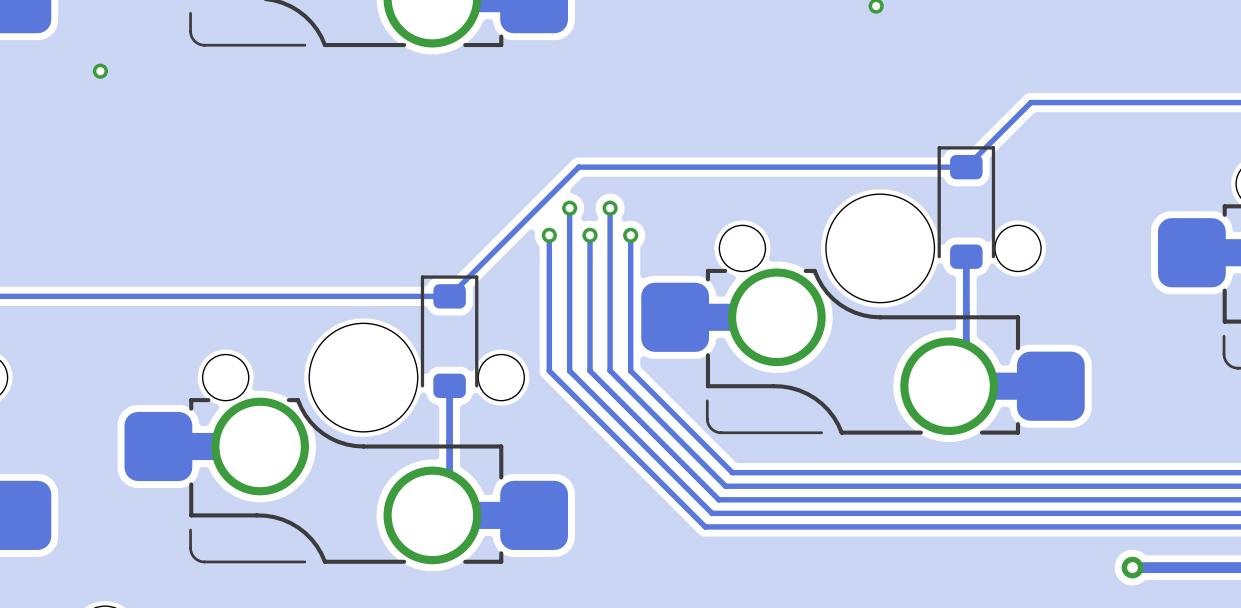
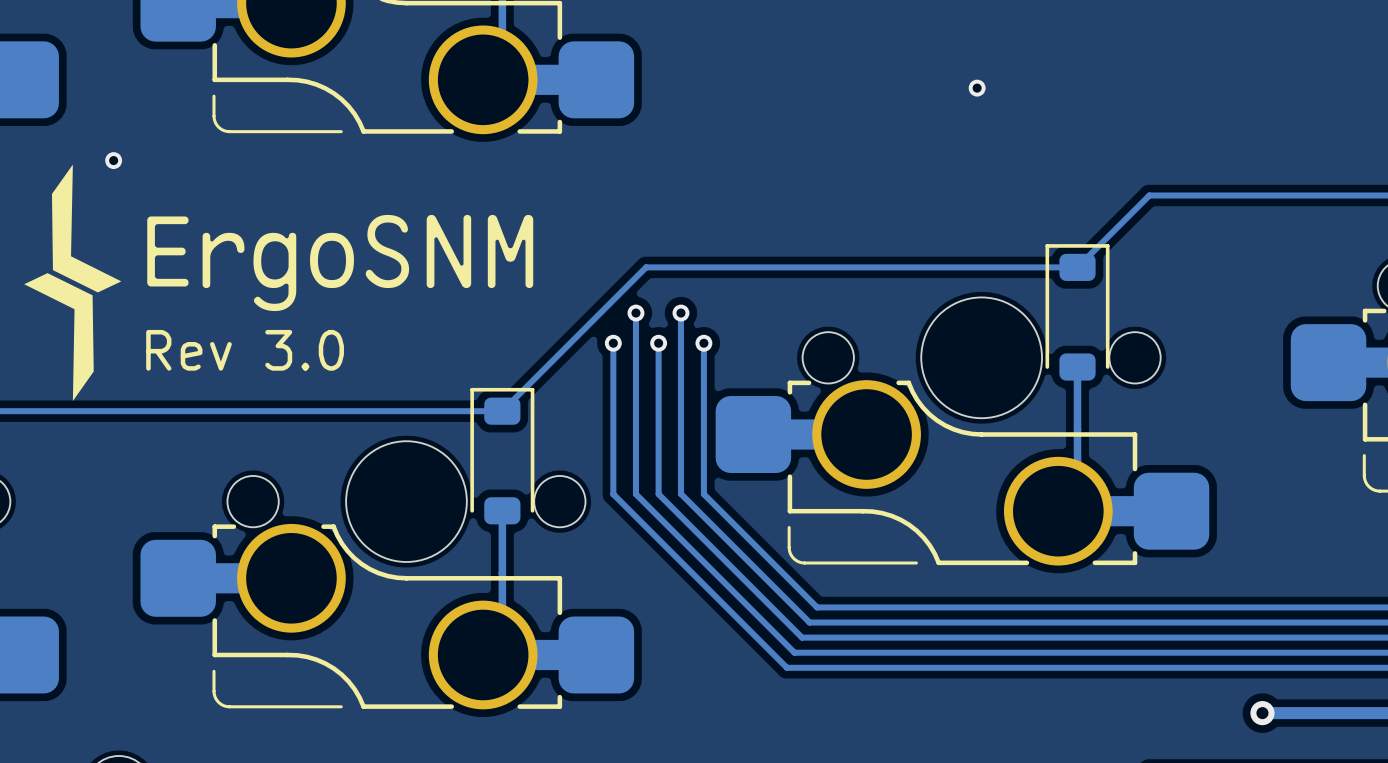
drawing: none -> [24, 164, 534, 401]
text: none -> Rev 3.0 (245, 350)

